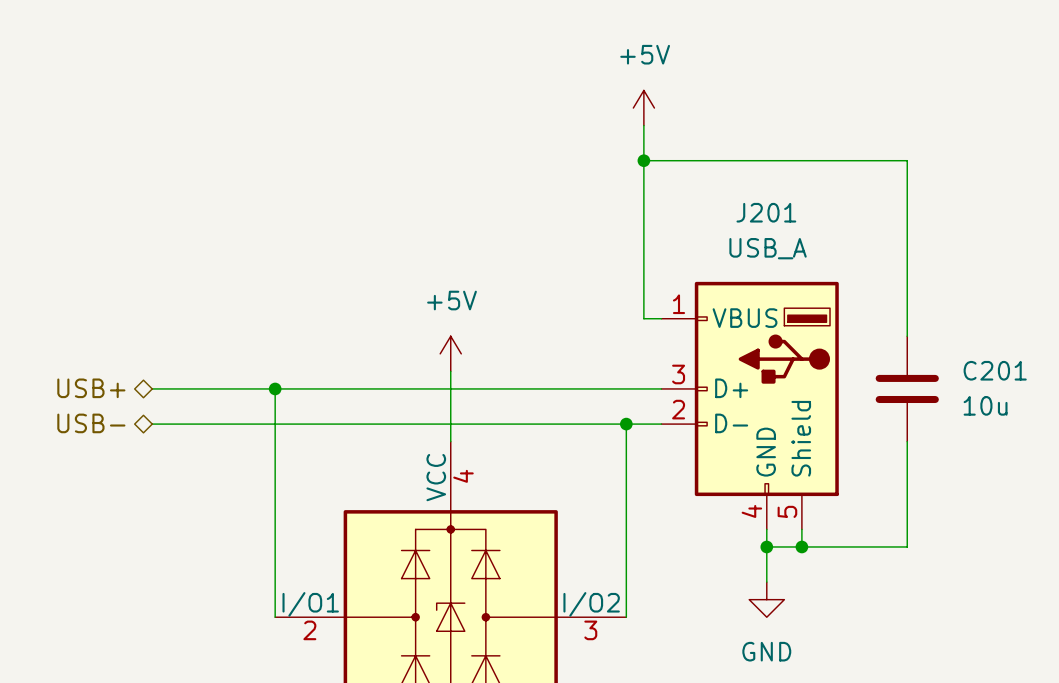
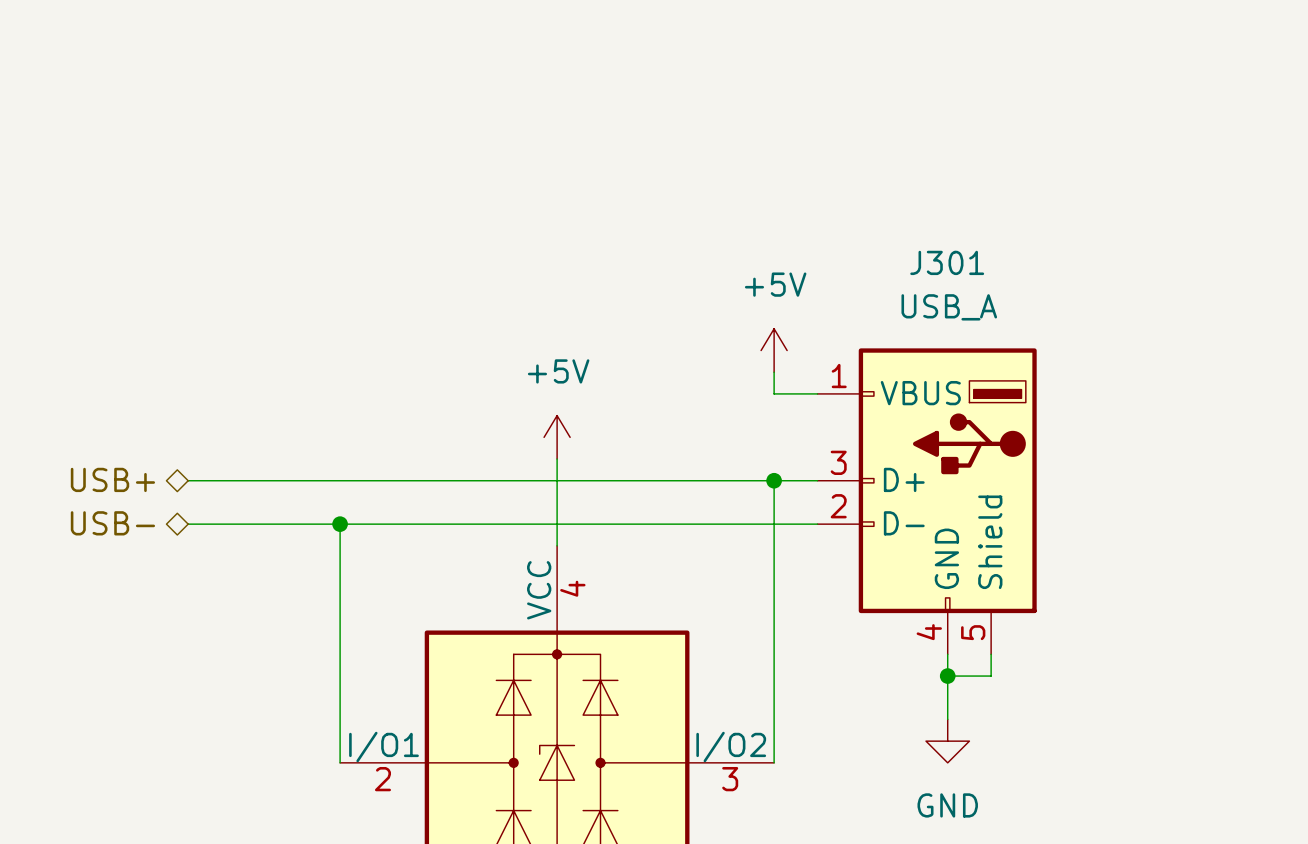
power symbol position: +5V (643, 108) -> +5V (774, 350)
wire: (643, 125) (643, 318) -> (774, 372) (774, 393) (795, 393)
wire: (643, 160) (907, 160) (907, 336) -> none
junction: (643, 160) -> none
J201 name: J201 (766, 212) -> J301 (947, 262)
wire: (275, 388) (275, 424) -> none
junction position: (275, 388) -> (340, 524)
wire: none -> (774, 480) (774, 524)
C201: 10u (907, 388) -> none
junction position: (626, 424) -> (774, 480)
wire: (907, 441) (907, 546) (801, 546) -> none
junction: (801, 546) -> none

